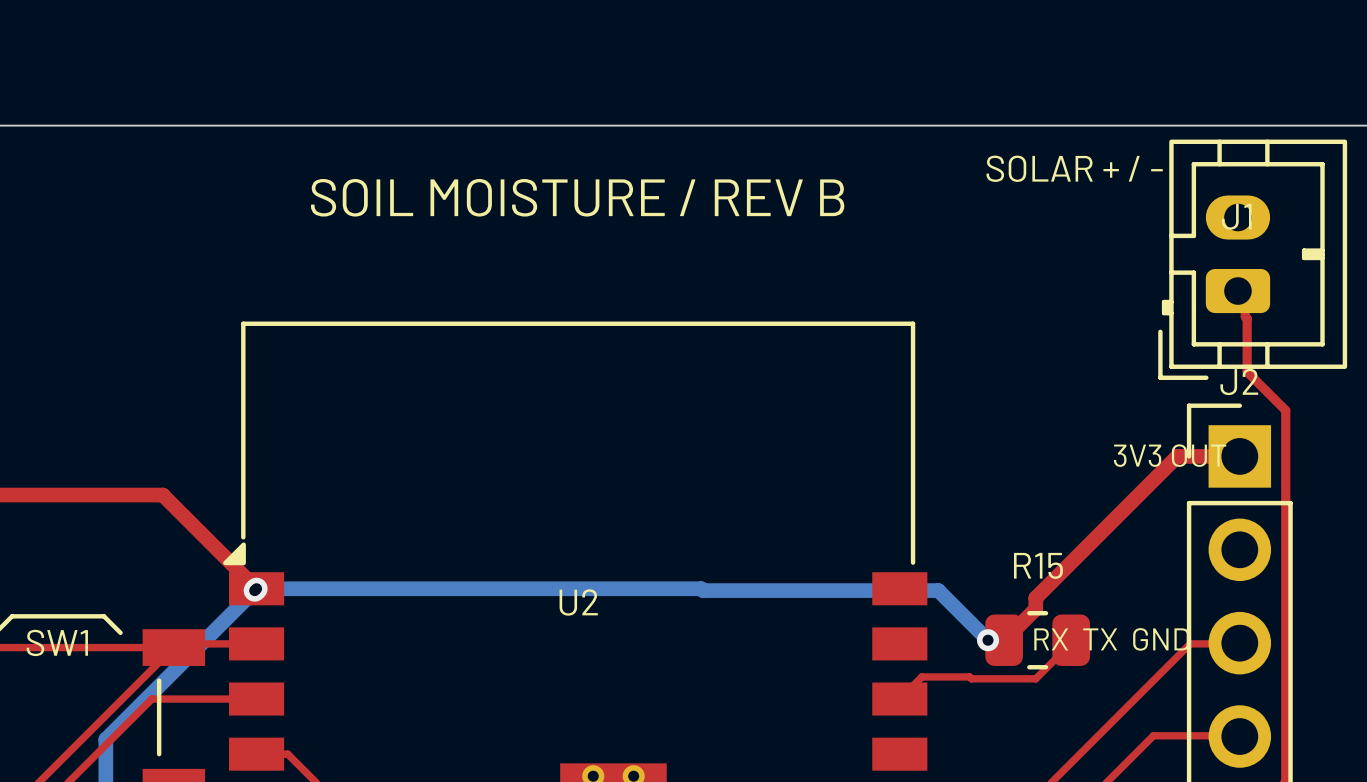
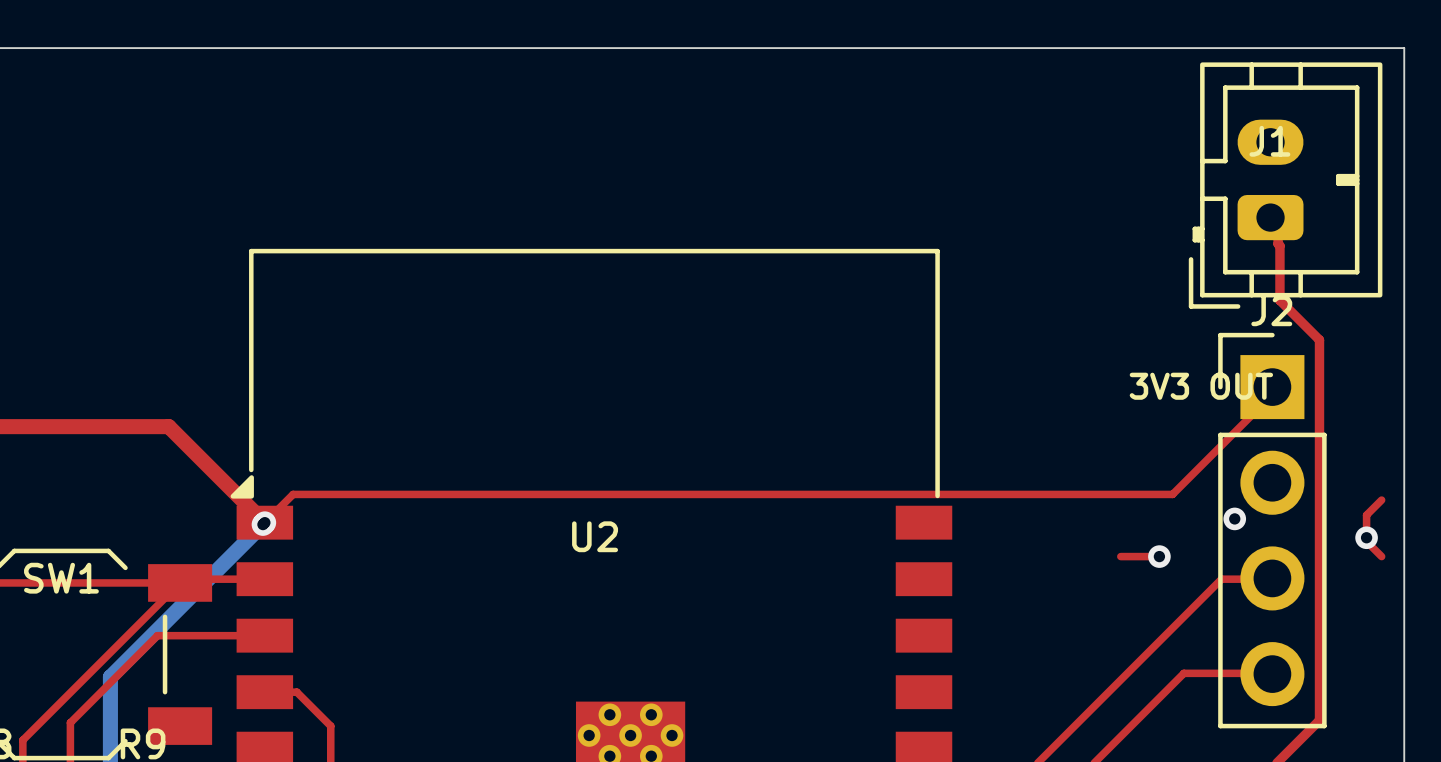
text: SOLAR + / - (1074, 168) -> none
text: SOIL MOISTURE / REV B (577, 197) -> none
top track: (1239, 456) (1177, 456) (1035, 597) (1035, 608) (1004, 640) (988, 640) -> (1272, 387) (1272, 394) (1172, 494) (293, 494) (264, 522)
top track: none -> (1381, 500) (1366, 515) (1366, 541) (1381, 556)
via: none -> (1234, 518)
bottom track: (256, 588) (938, 590) (988, 640) -> none
via: none -> (1366, 537)
top track: none -> (1120, 556) (1159, 556)
via: none -> (1159, 556)
text: RX TX GND (1111, 639) -> none
via: (988, 640) -> none
R15: (1037, 640) -> none
top track: (1070, 640) (1070, 643) (1035, 678) (921, 676) (899, 699) -> none

